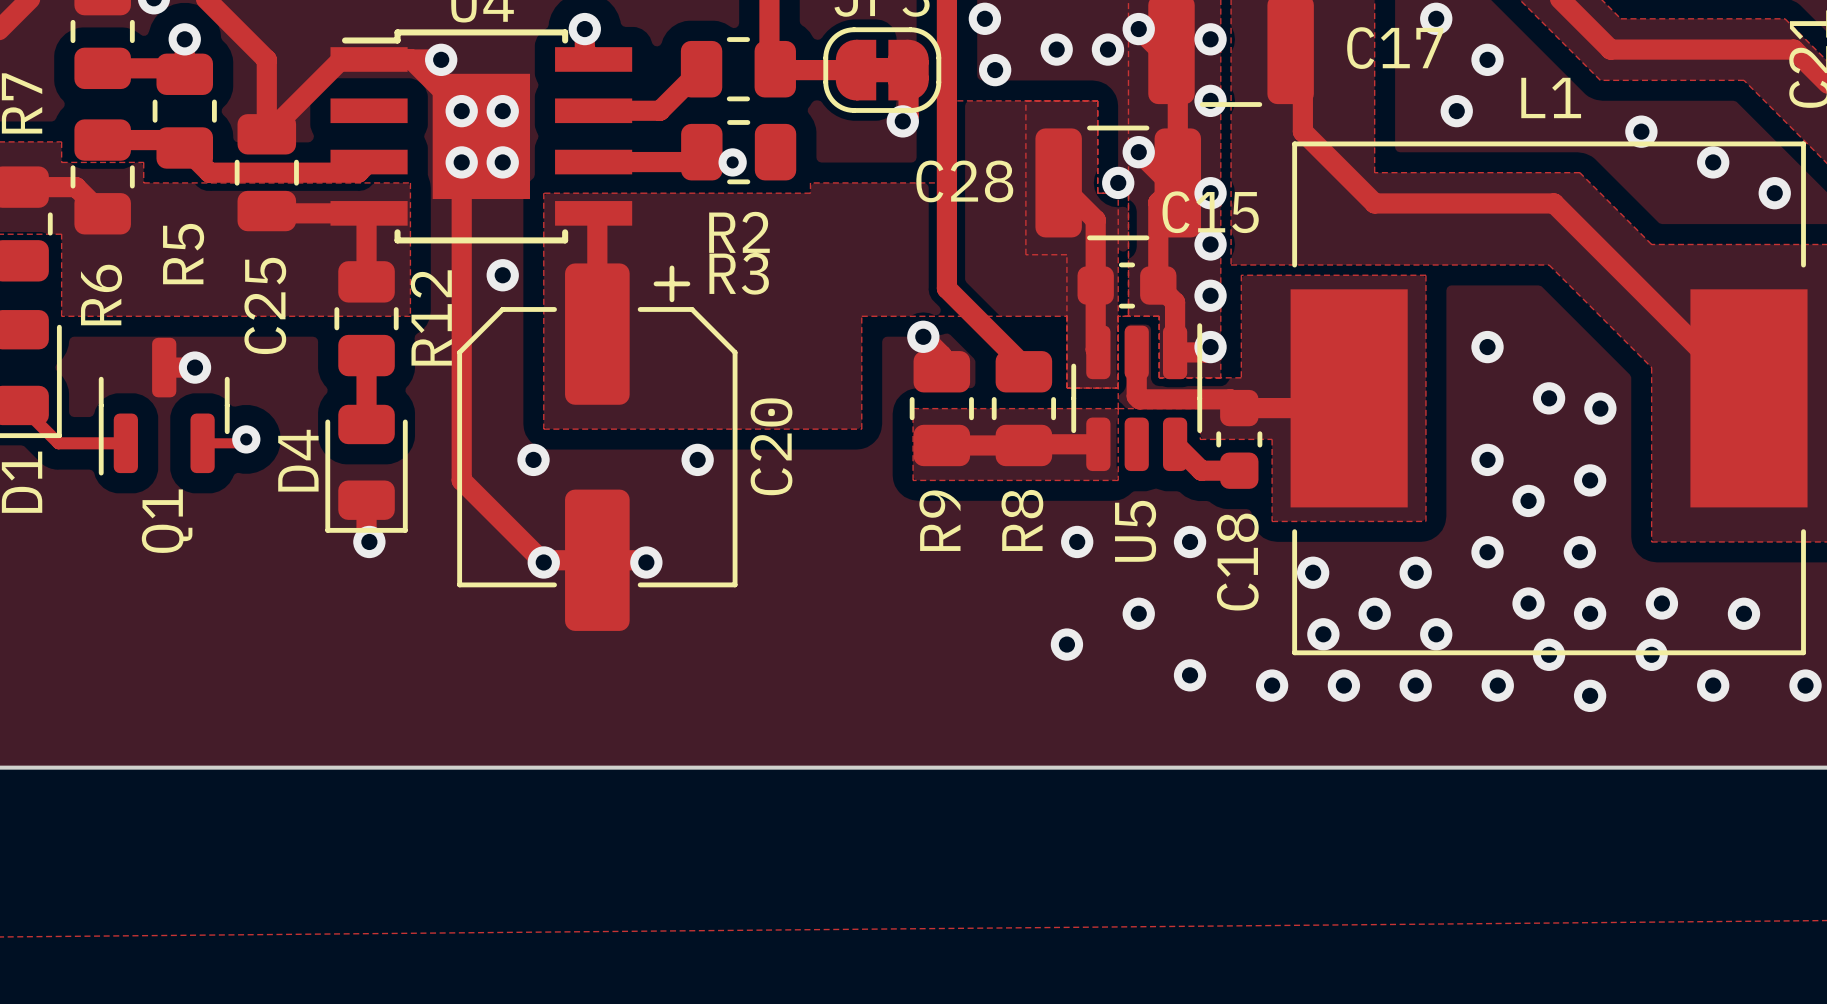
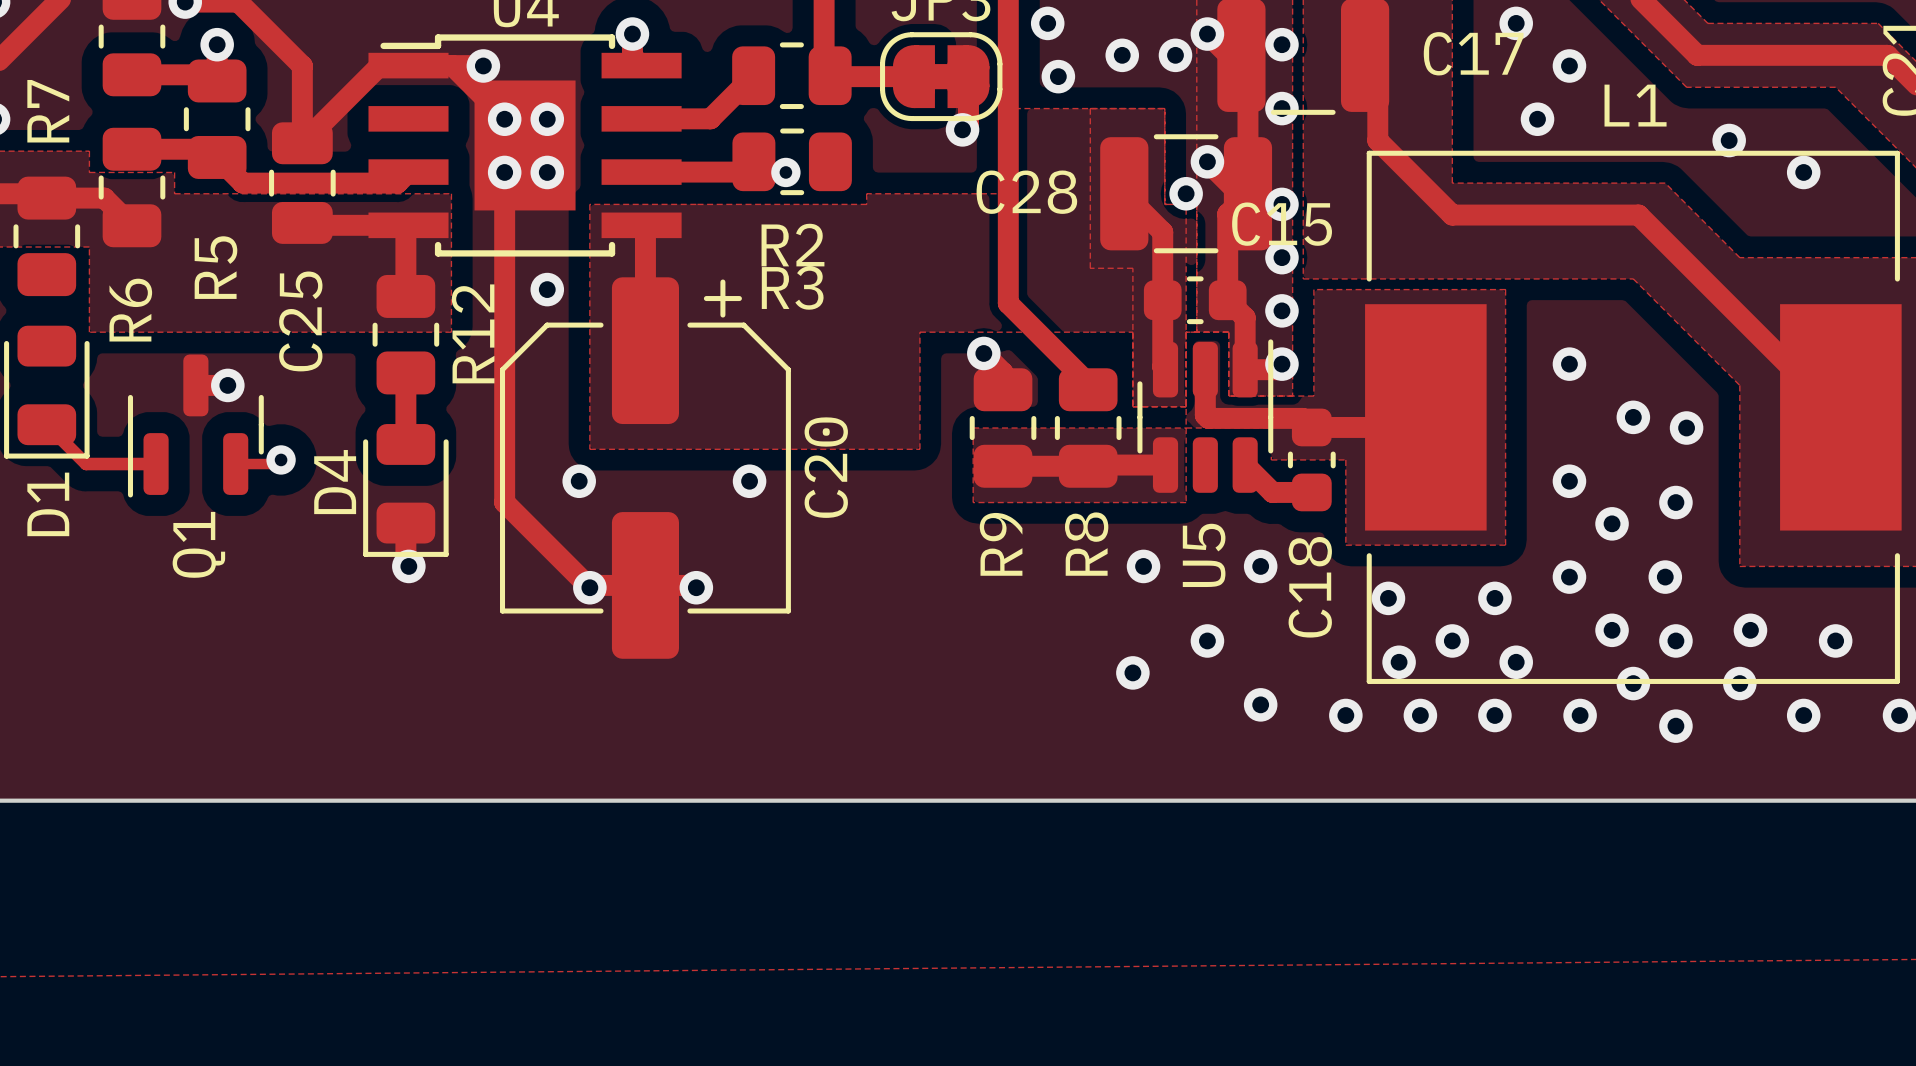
via: (1774, 193) -> none

